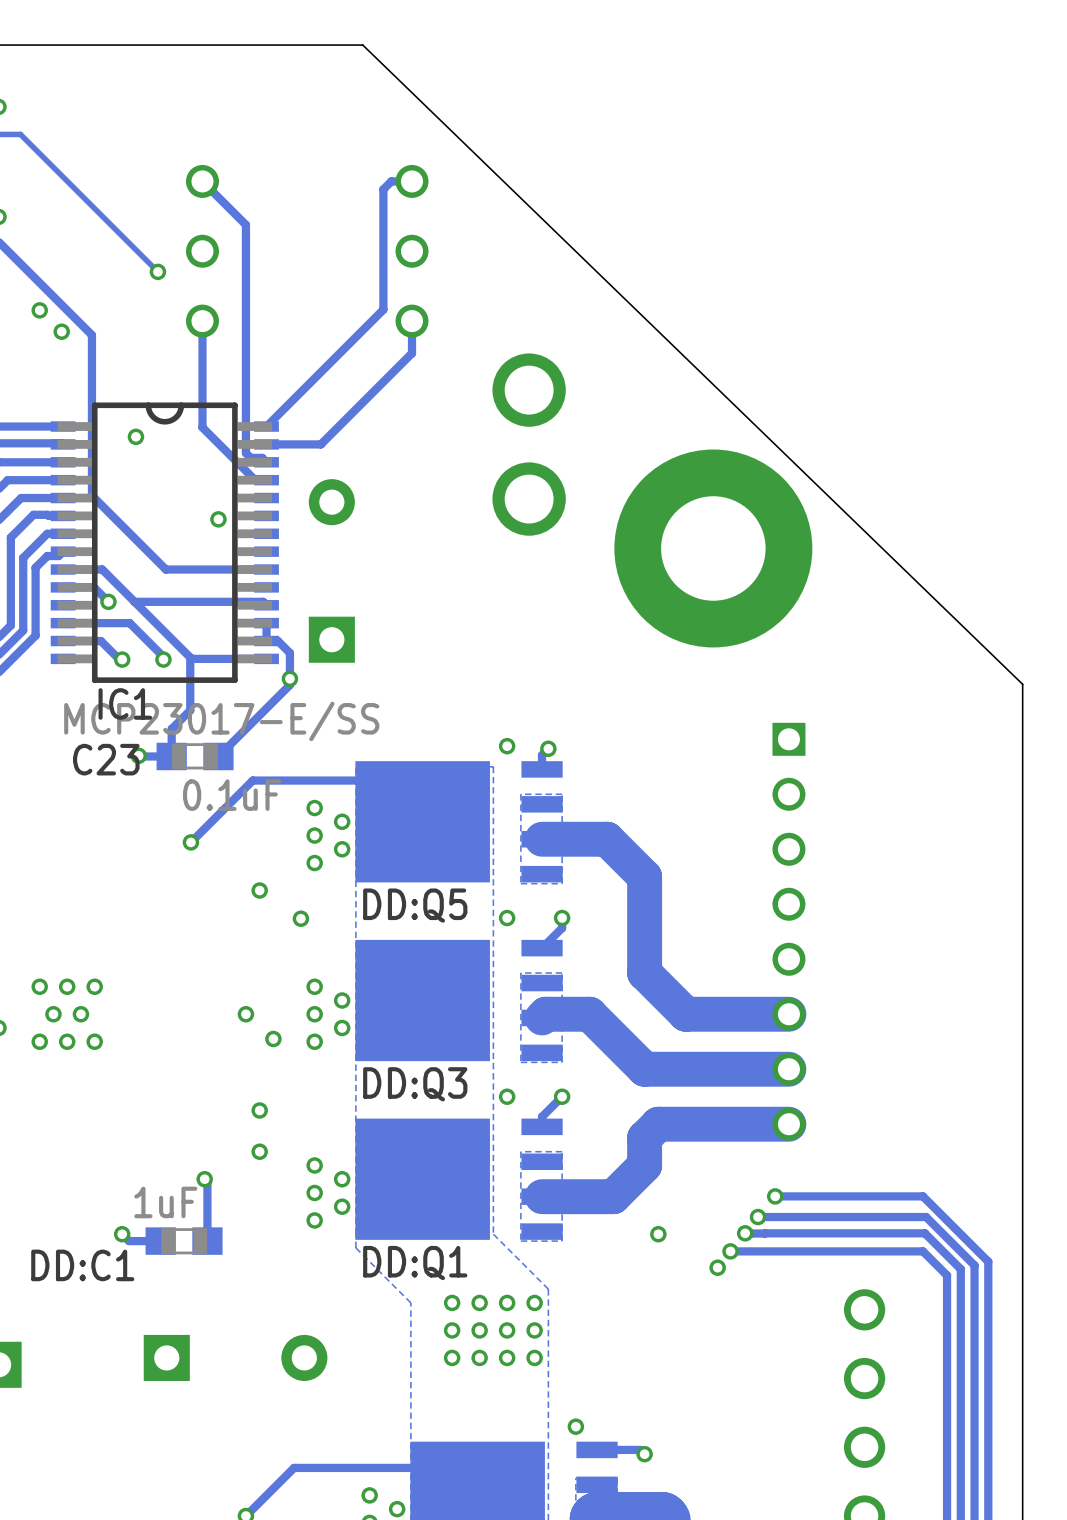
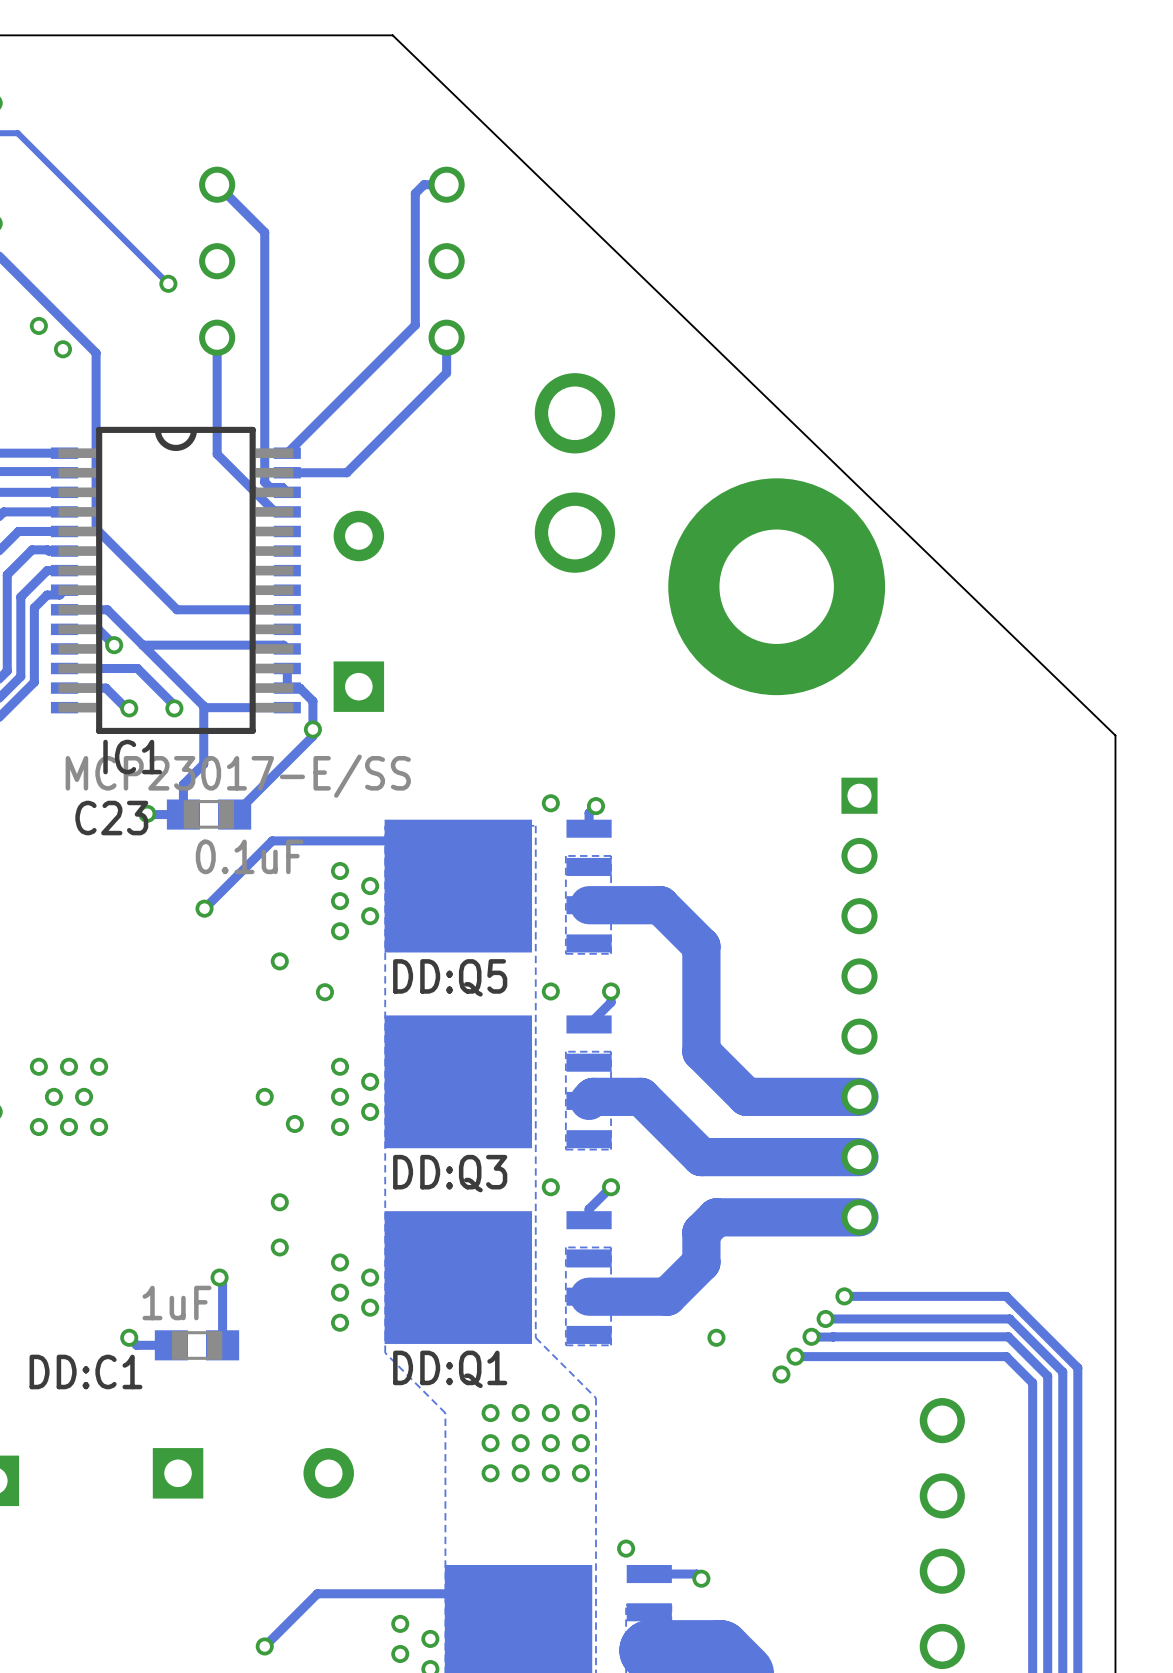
via: (135, 436) -> none
via: (218, 519) -> none

